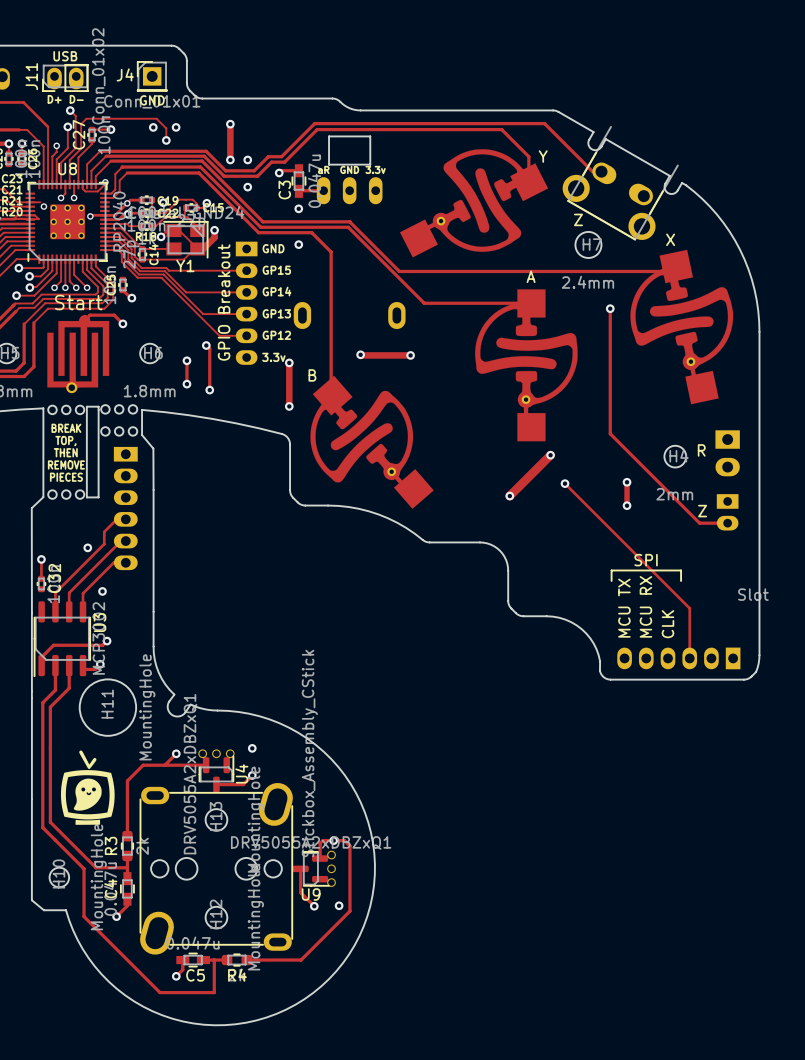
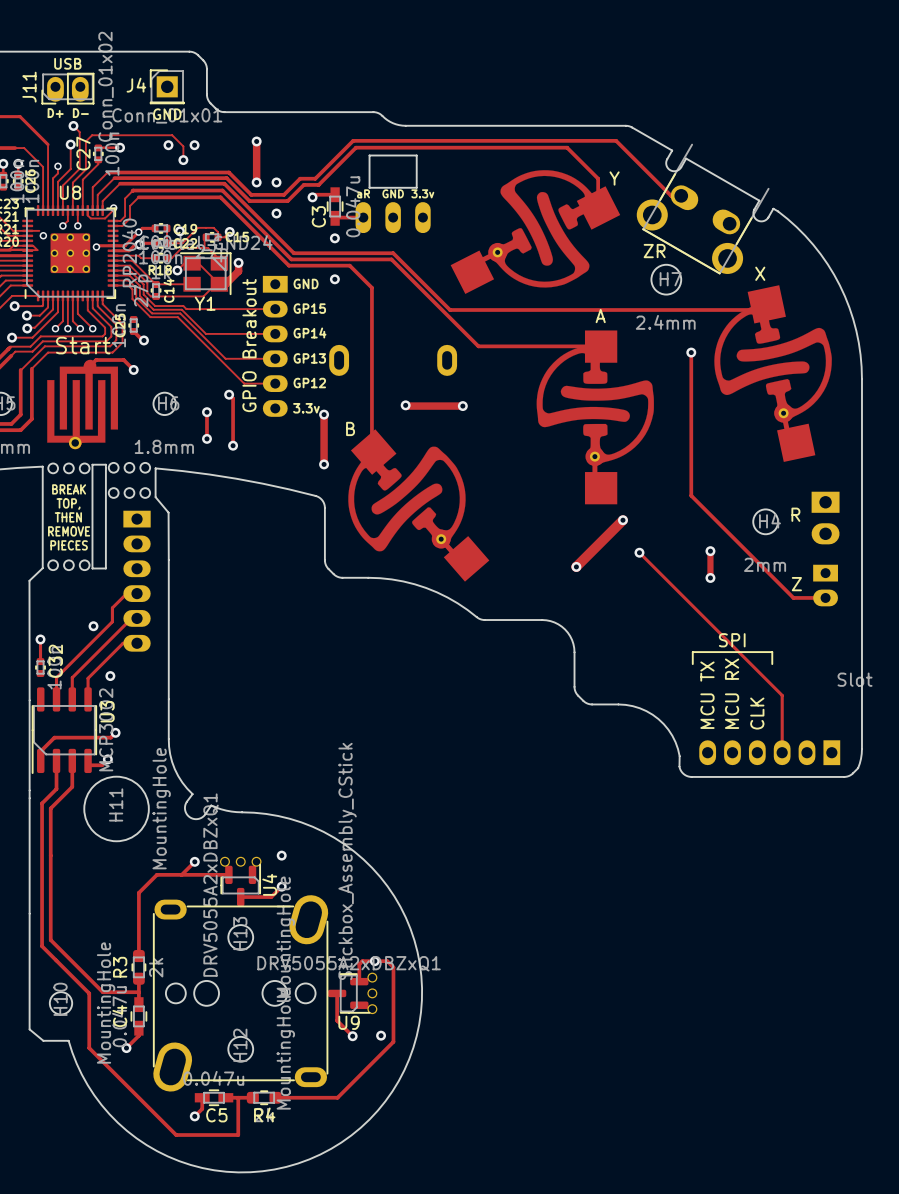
text: Z (578, 219) -> ZR (654, 251)
drawing: [60, 750, 115, 825] -> none

